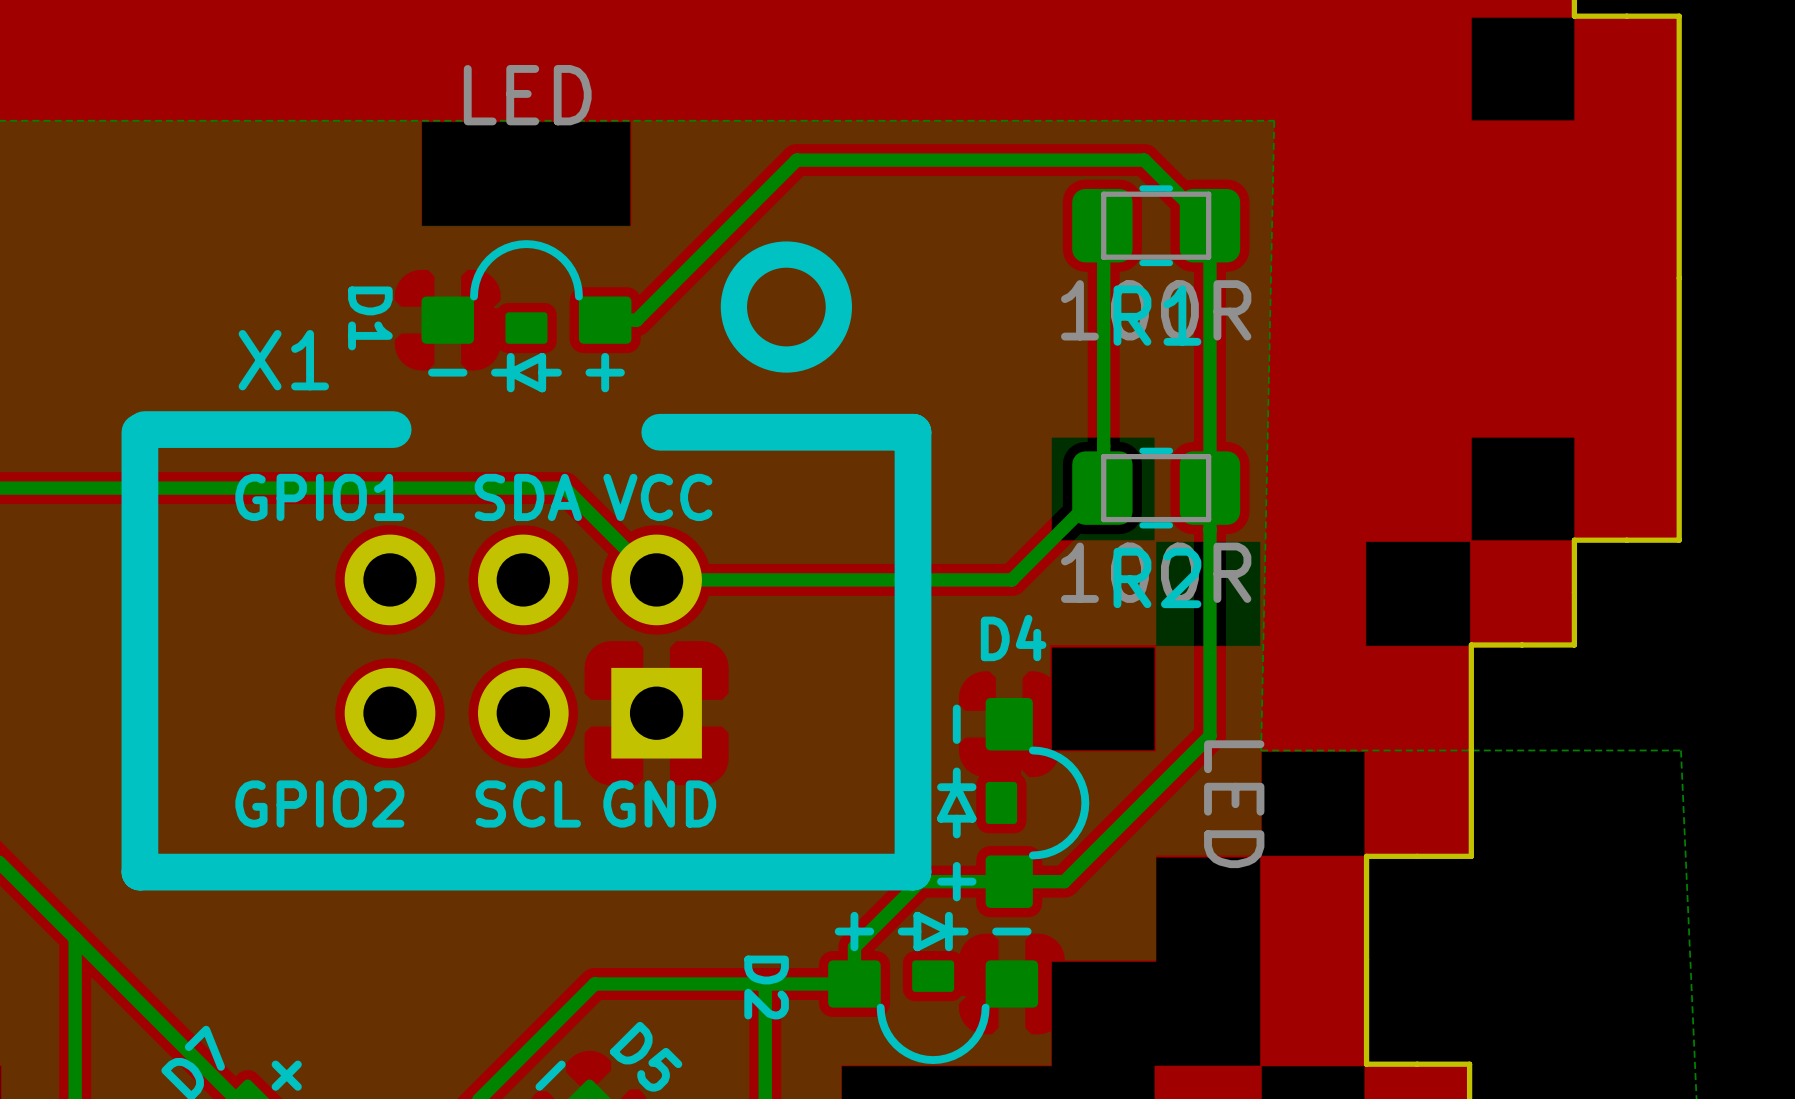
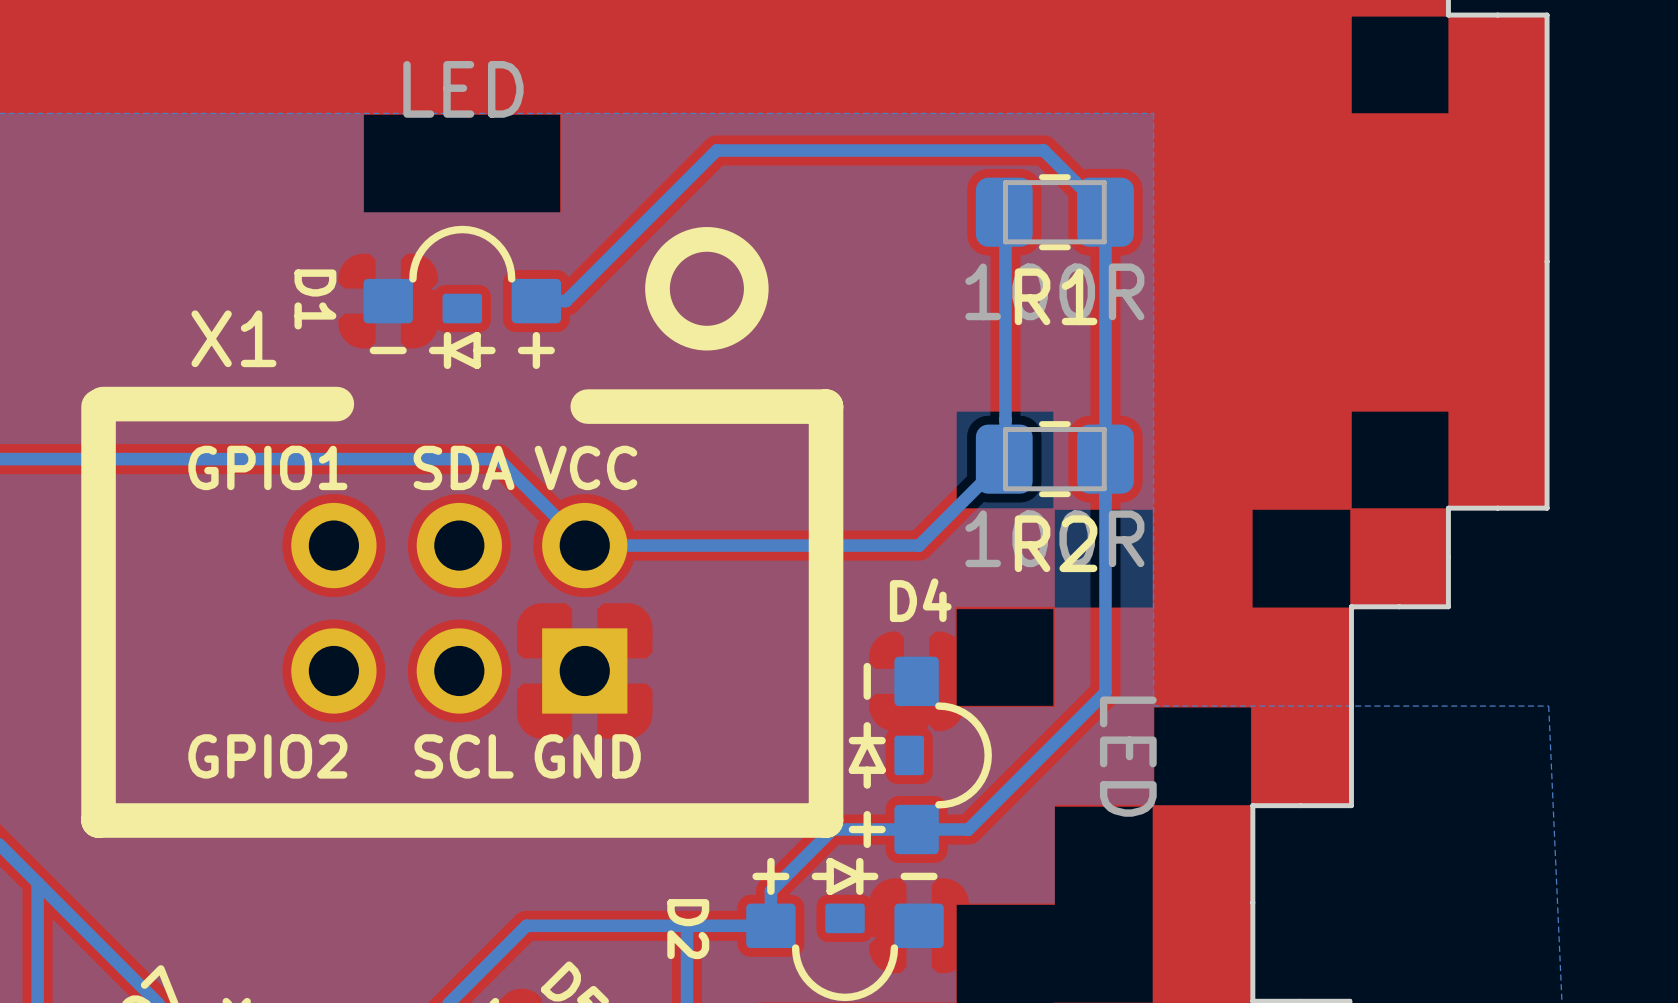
bottom zone outline: (1261, 120) (1274, 120) (1261, 750) -> (1153, 113) (1153, 706)

